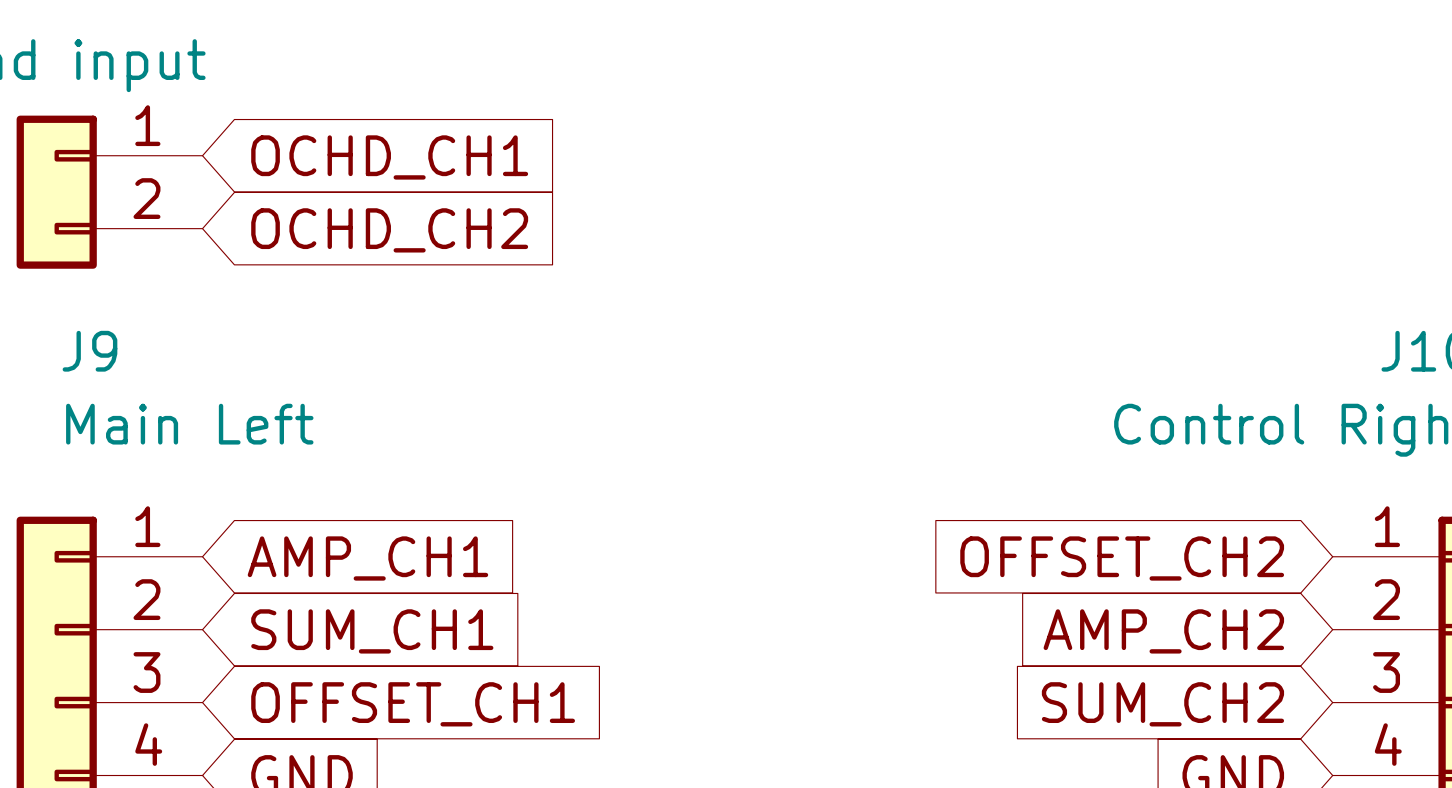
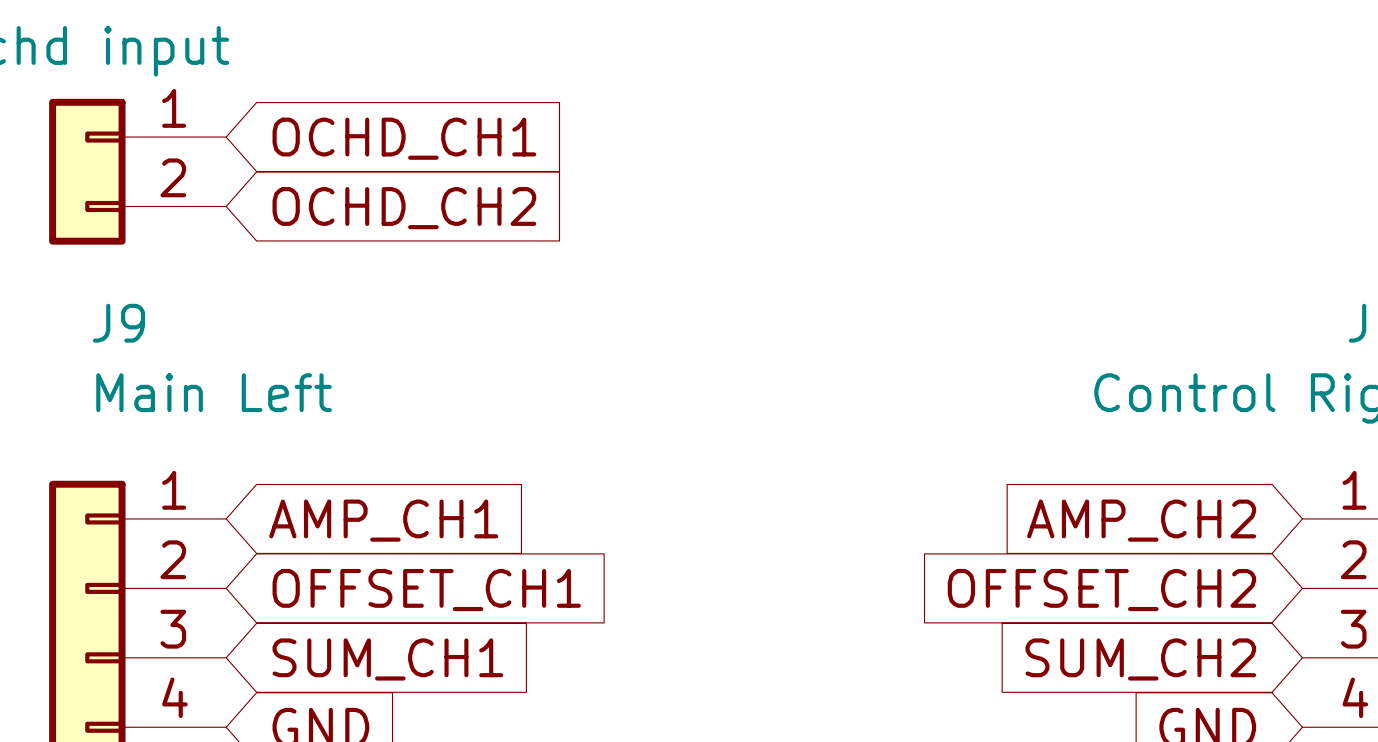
global label: OFFSET_CH2 (1122, 558) -> AMP_CH2 (1141, 520)
global label: SUM_CH1 (372, 631) -> OFFSET_CH1 (426, 590)
global label: AMP_CH2 (1163, 631) -> OFFSET_CH2 (1101, 590)
global label: OFFSET_CH1 (413, 704) -> SUM_CH1 (387, 659)

